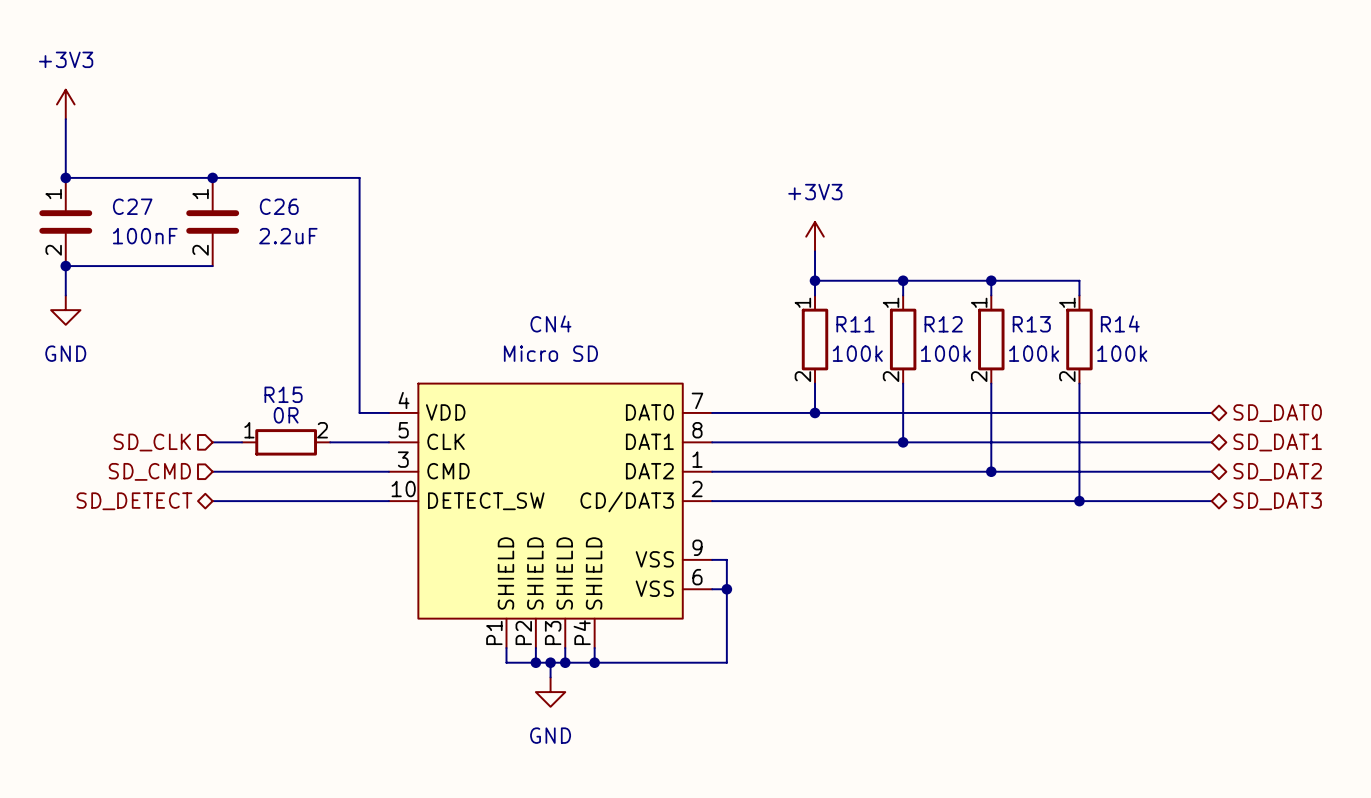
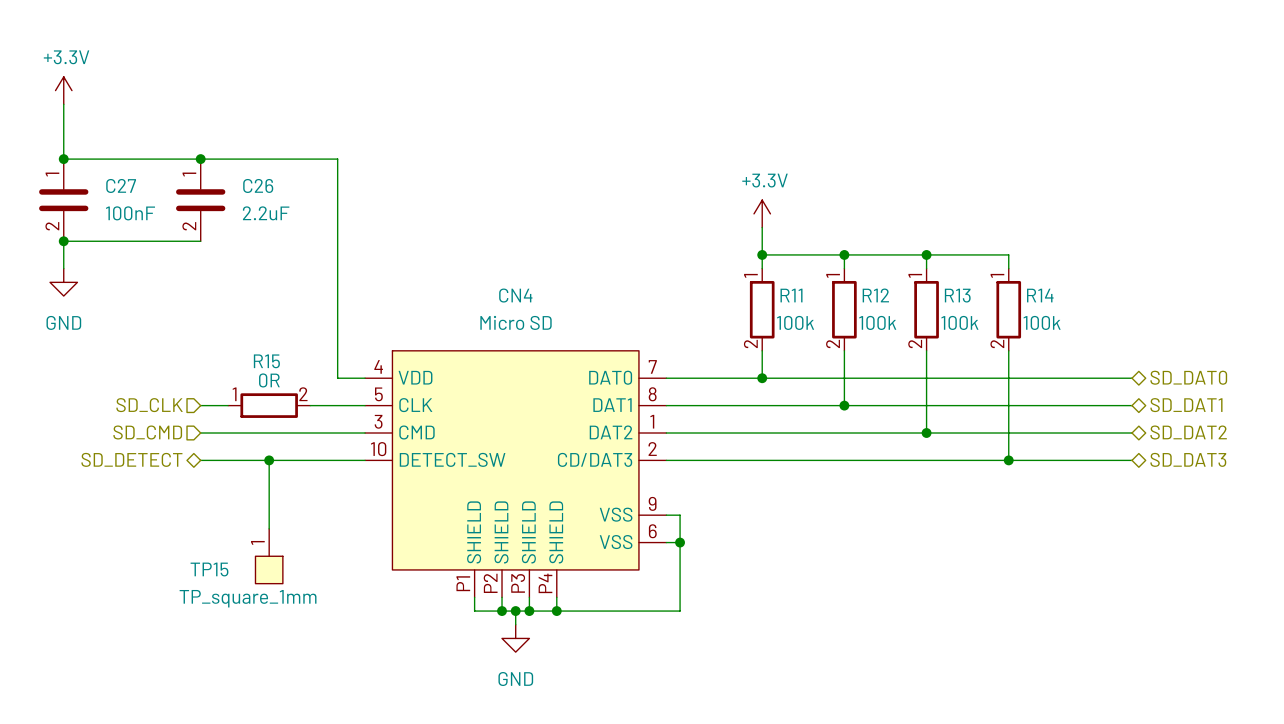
power symbol: +3V3 (65, 104) -> +3.3V (63, 90)
power symbol: +3V3 (815, 236) -> +3.3V (762, 213)
wire: none -> (269, 460) (269, 528)
junction: none -> (269, 460)
TP15: none -> TP_square_1mm (269, 556)

